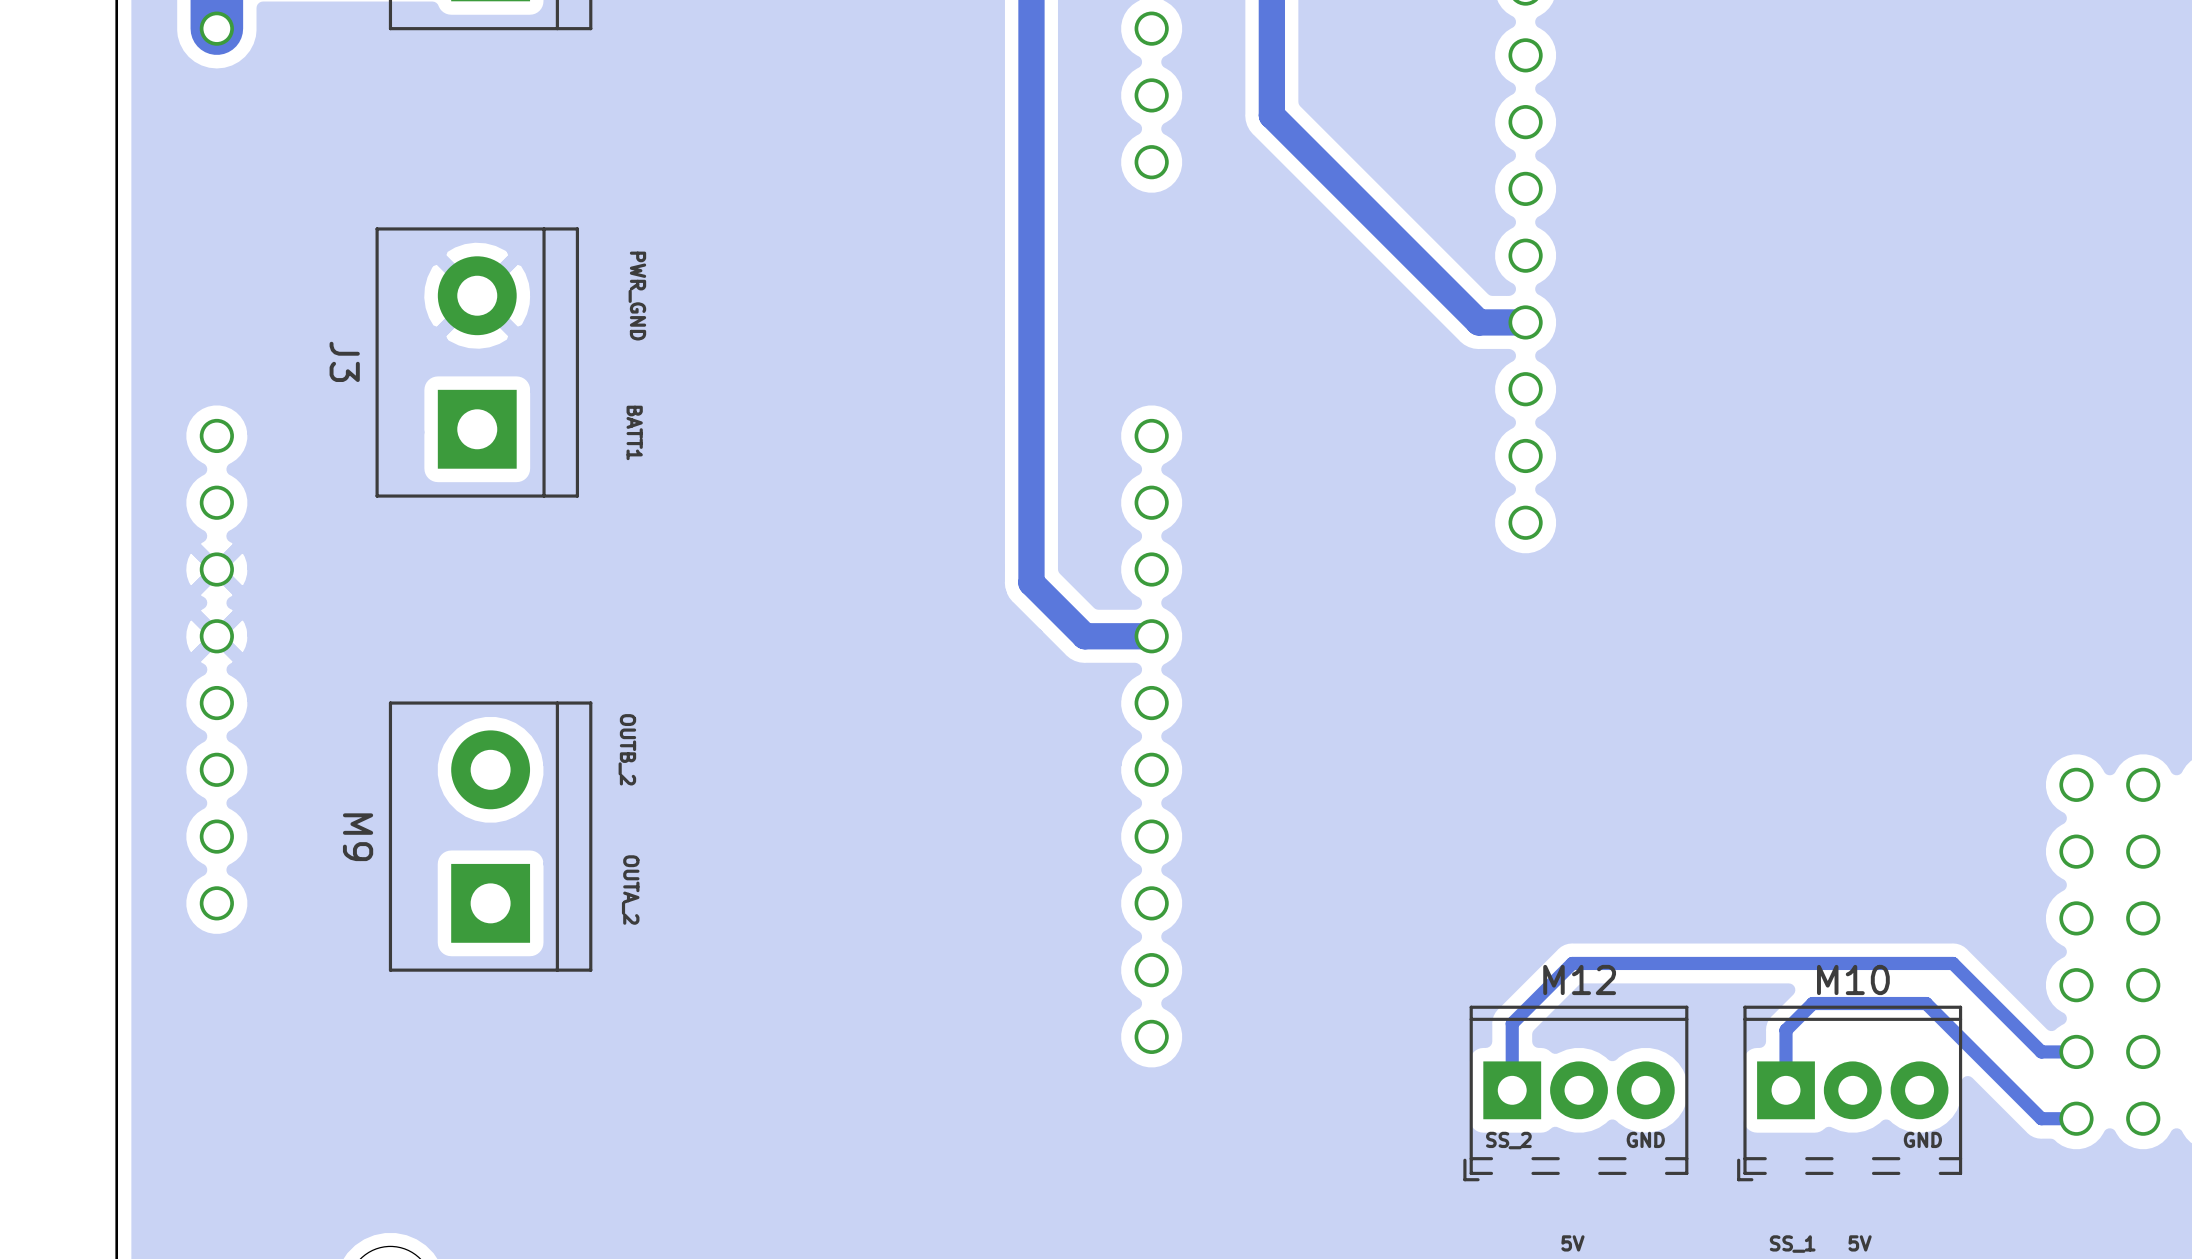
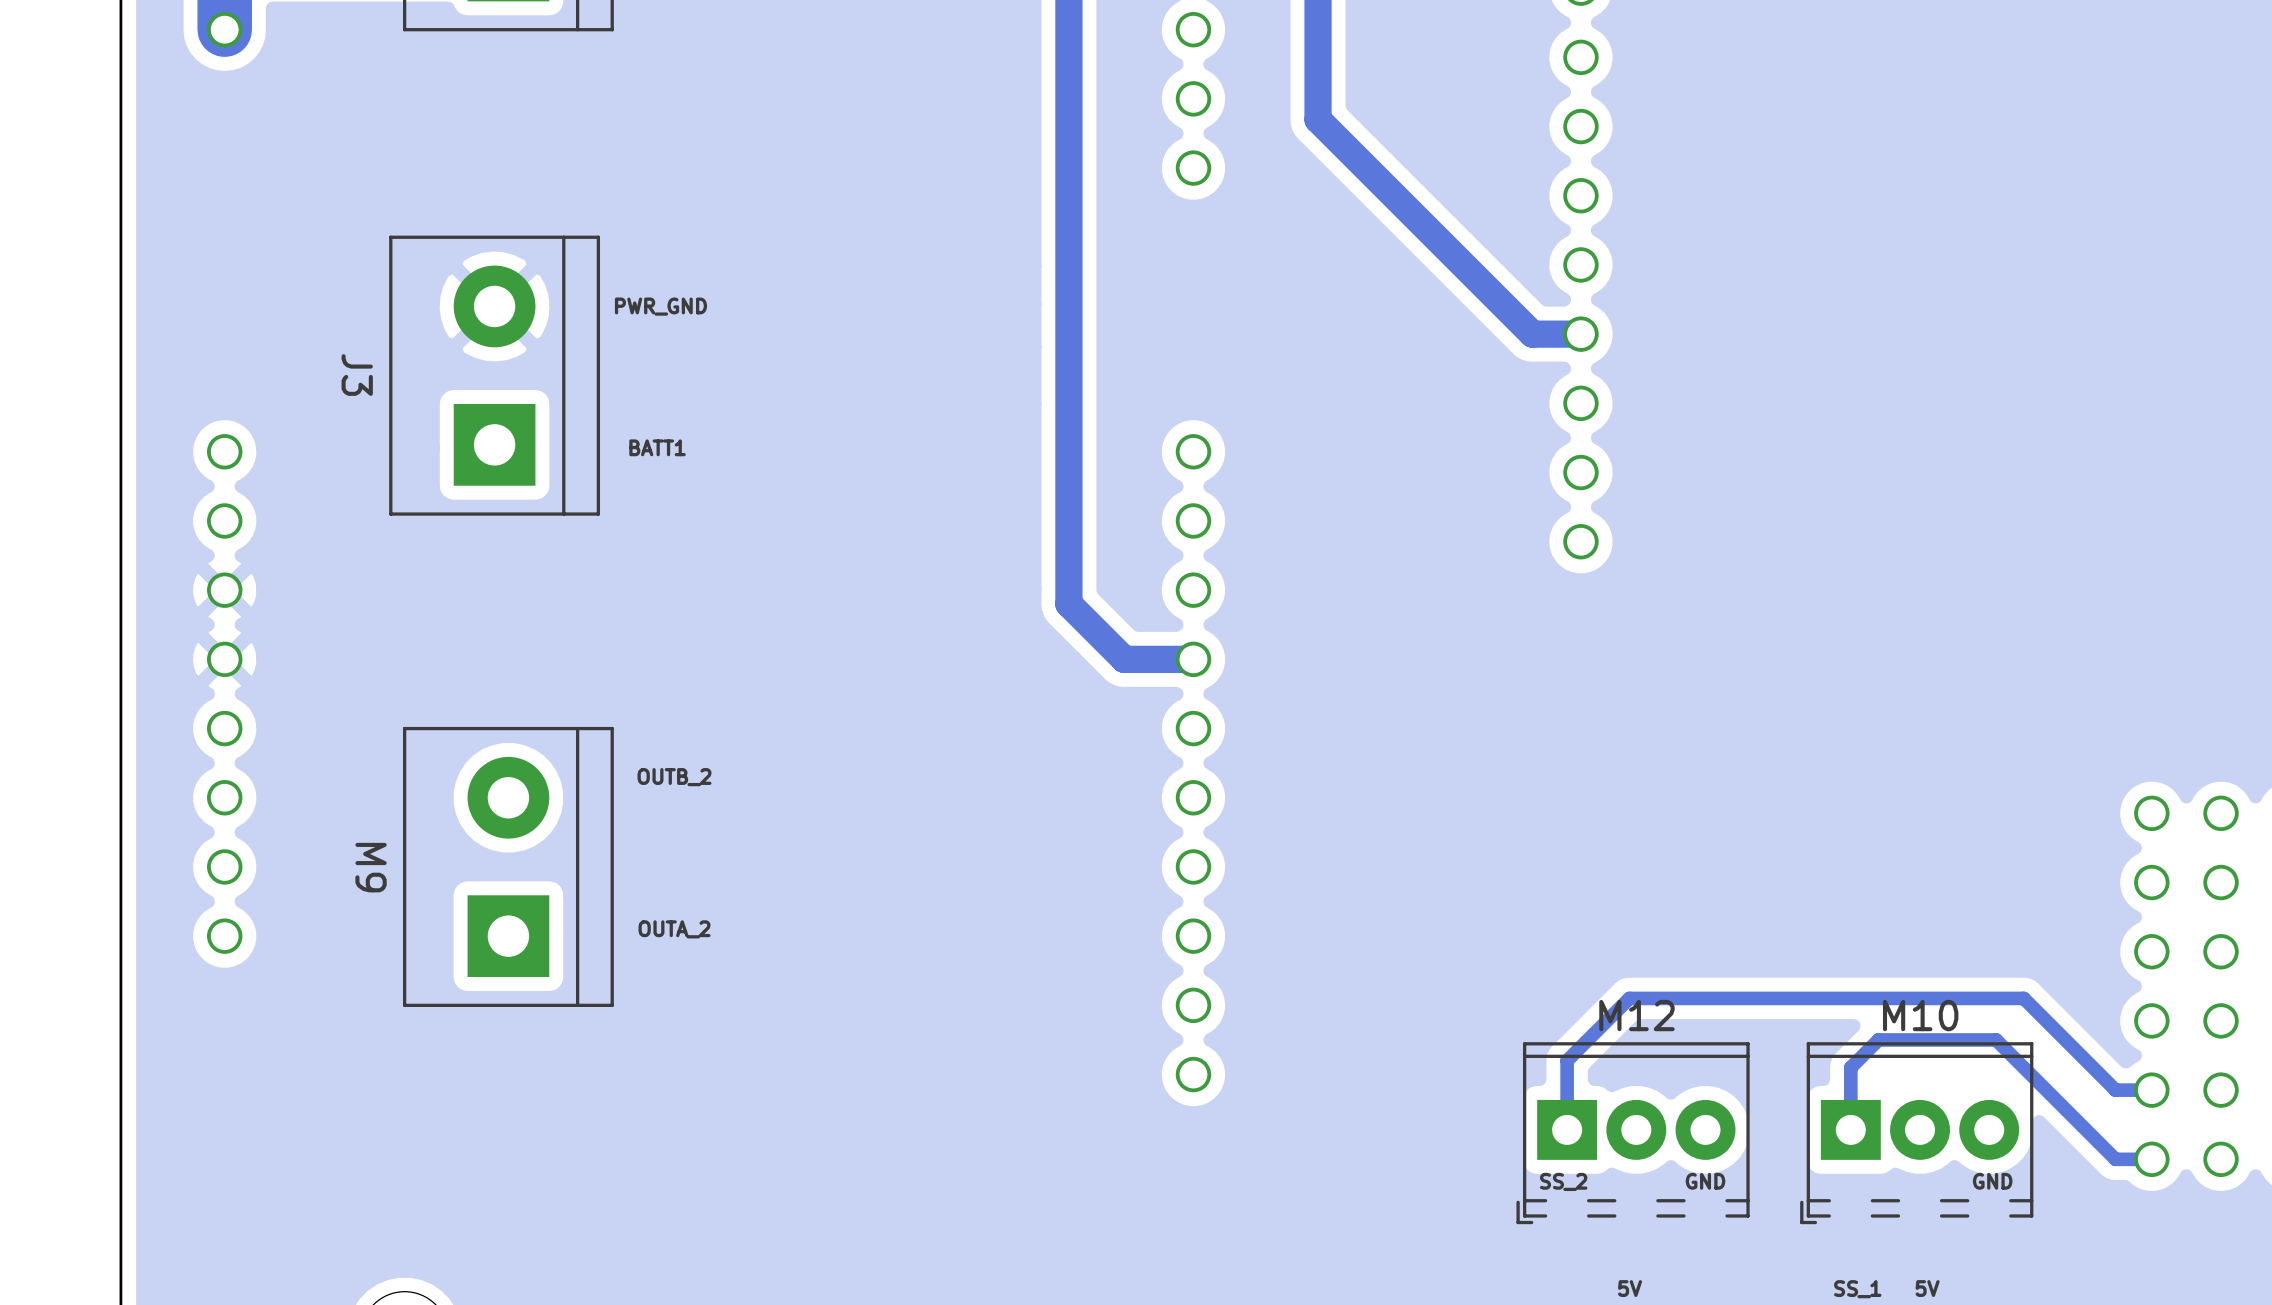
text rotation: 0° (637, 296) -> 90° counterclockwise (660, 306)
text rotation: 0° (634, 432) -> 90° counterclockwise (657, 447)
text rotation: 0° (627, 749) -> 90° counterclockwise (674, 777)
text rotation: 0° (630, 890) -> 90° counterclockwise (674, 929)

